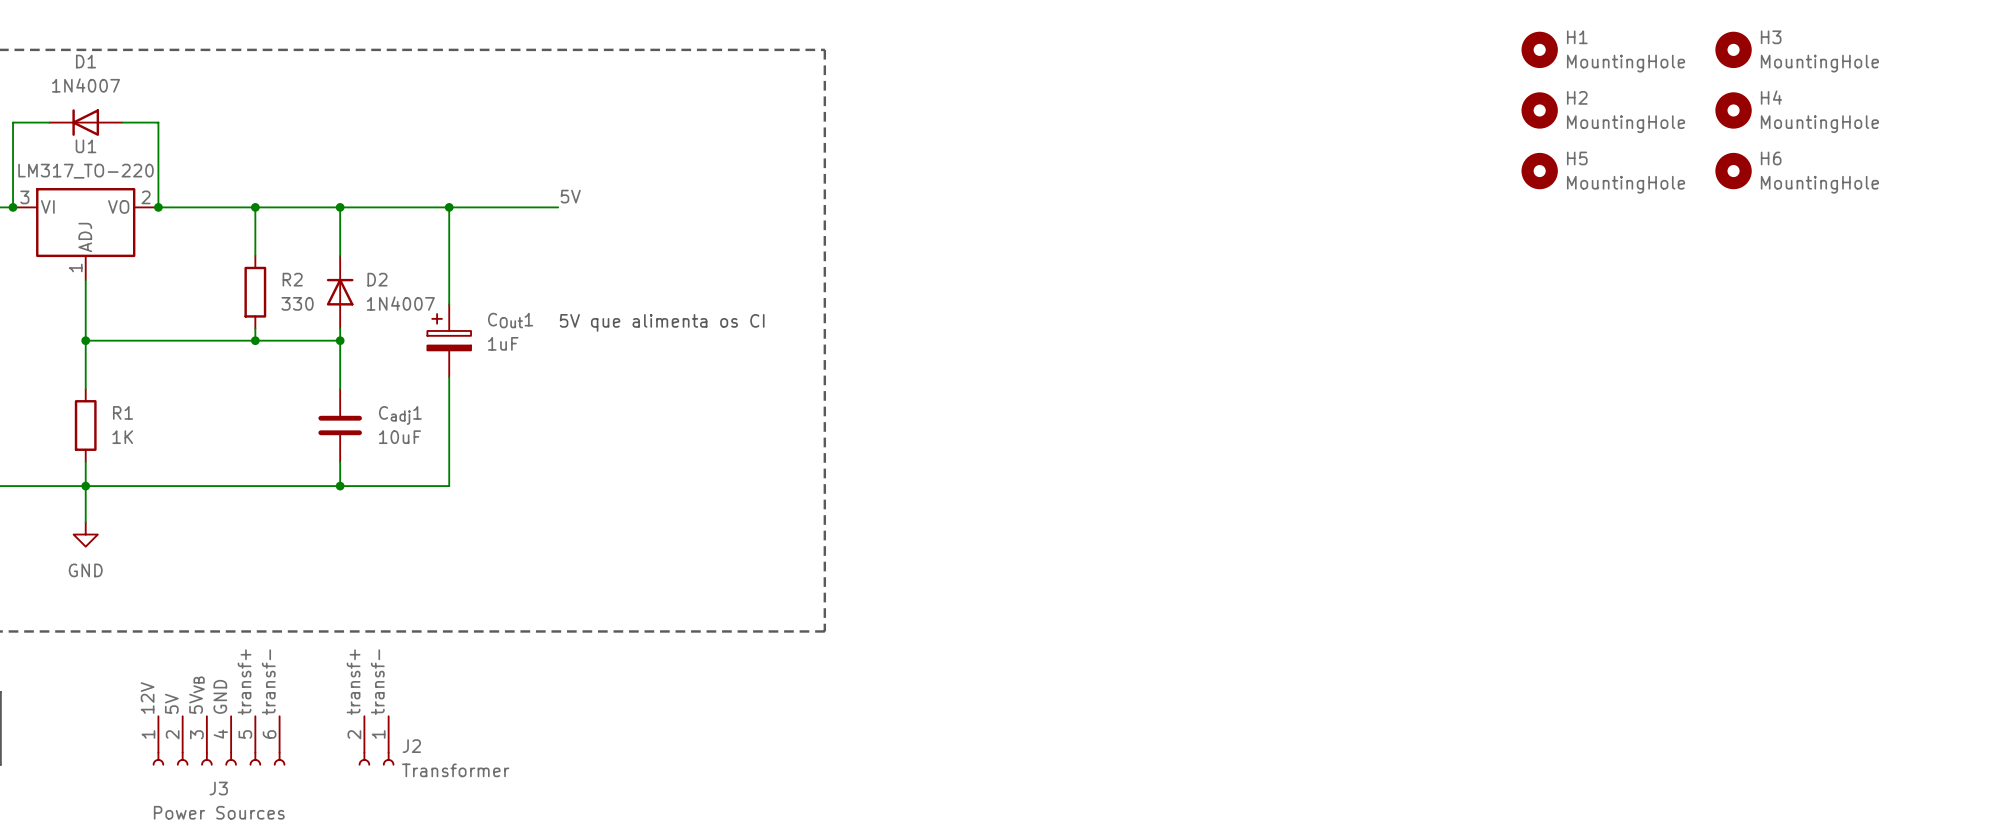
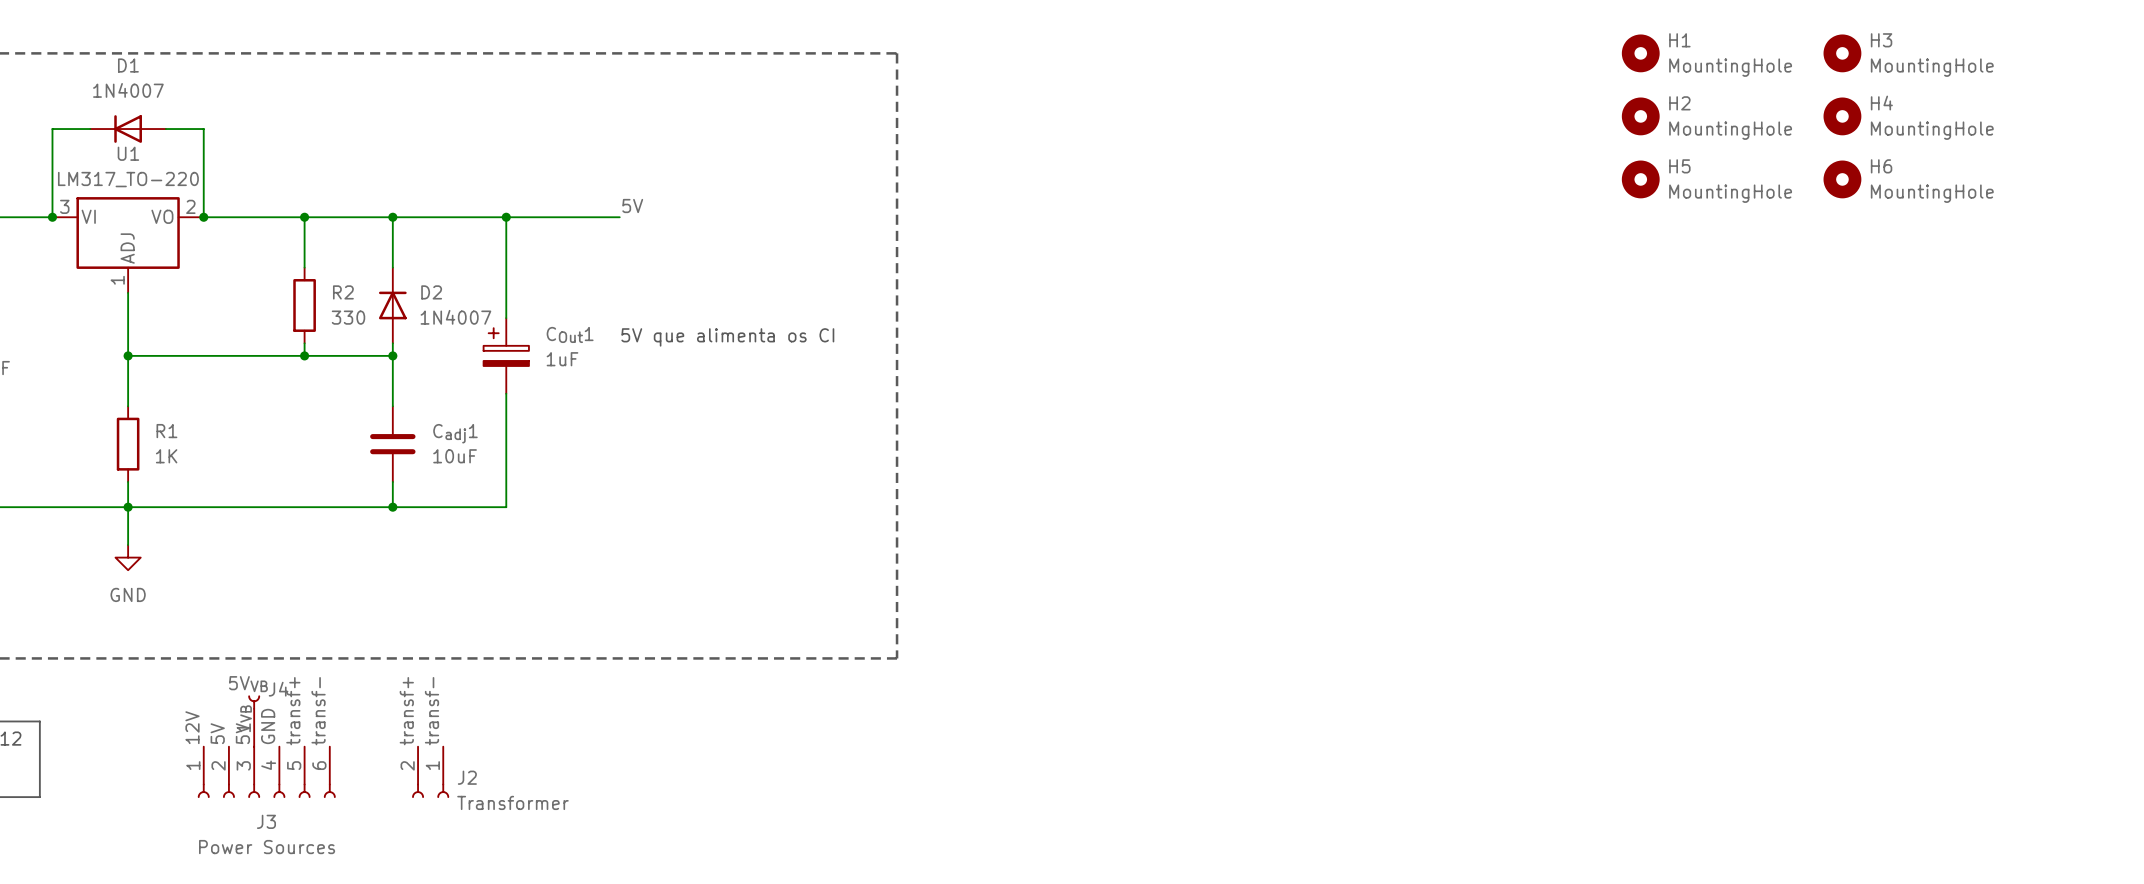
J4: none -> 5VVB (254, 721)

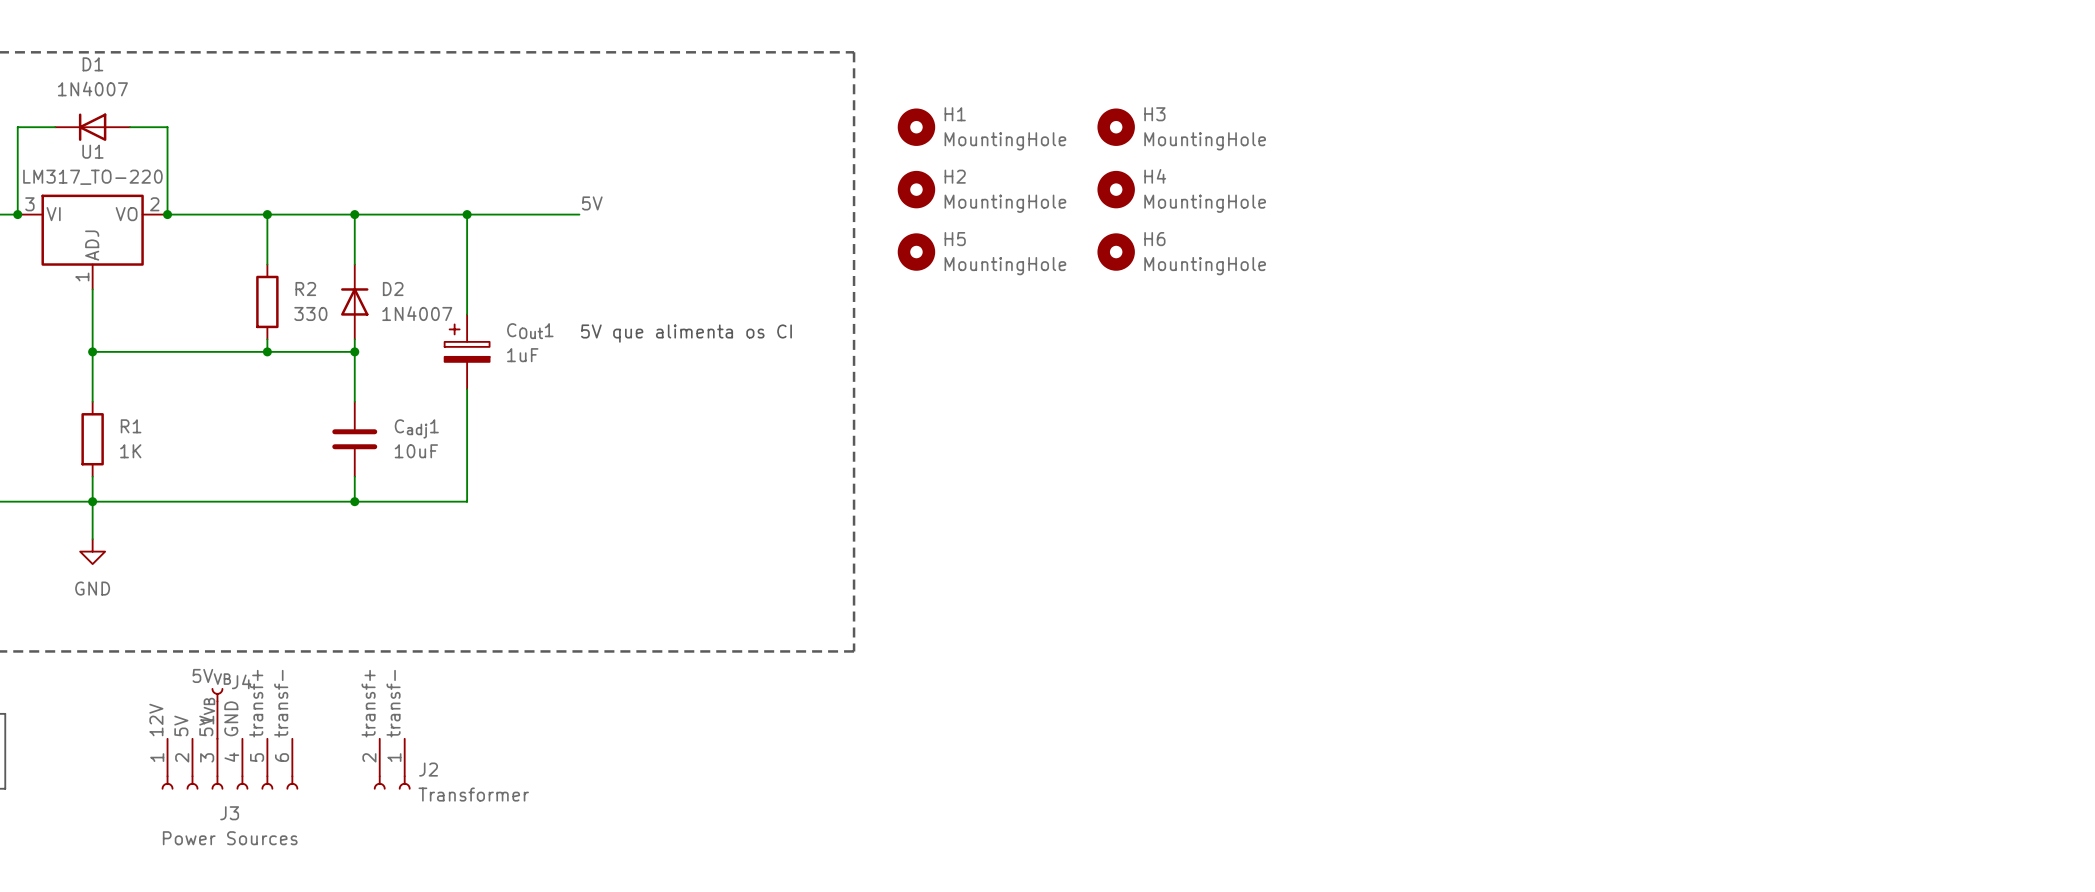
H1 position: (1640, 53) -> (916, 127)
H3 position: (1842, 53) -> (1116, 127)
H2 position: (1640, 116) -> (916, 189)
H4 position: (1842, 116) -> (1116, 189)
H5 position: (1640, 179) -> (916, 252)
H6 position: (1842, 179) -> (1116, 252)

